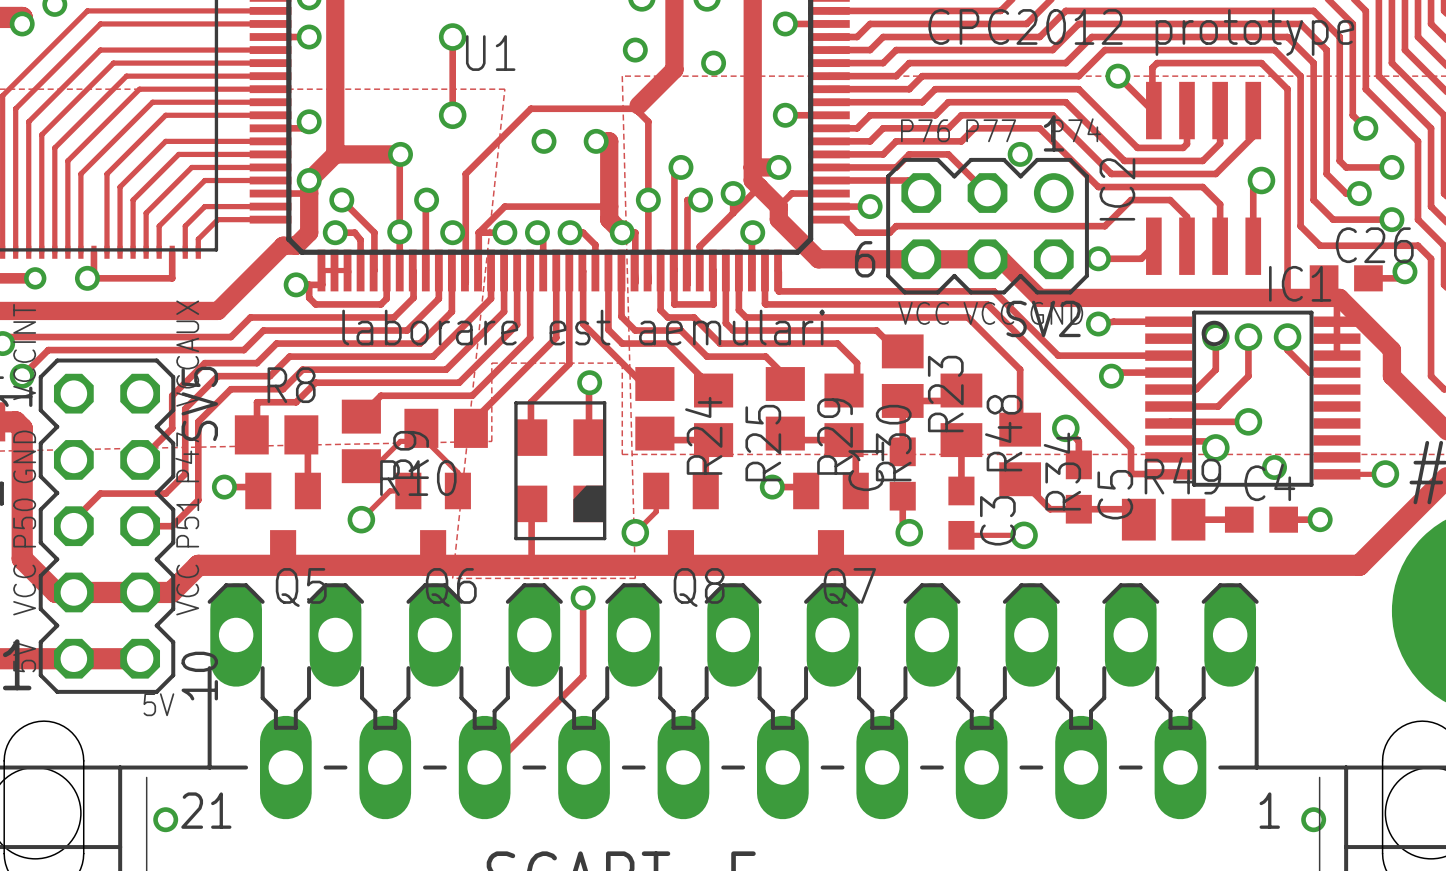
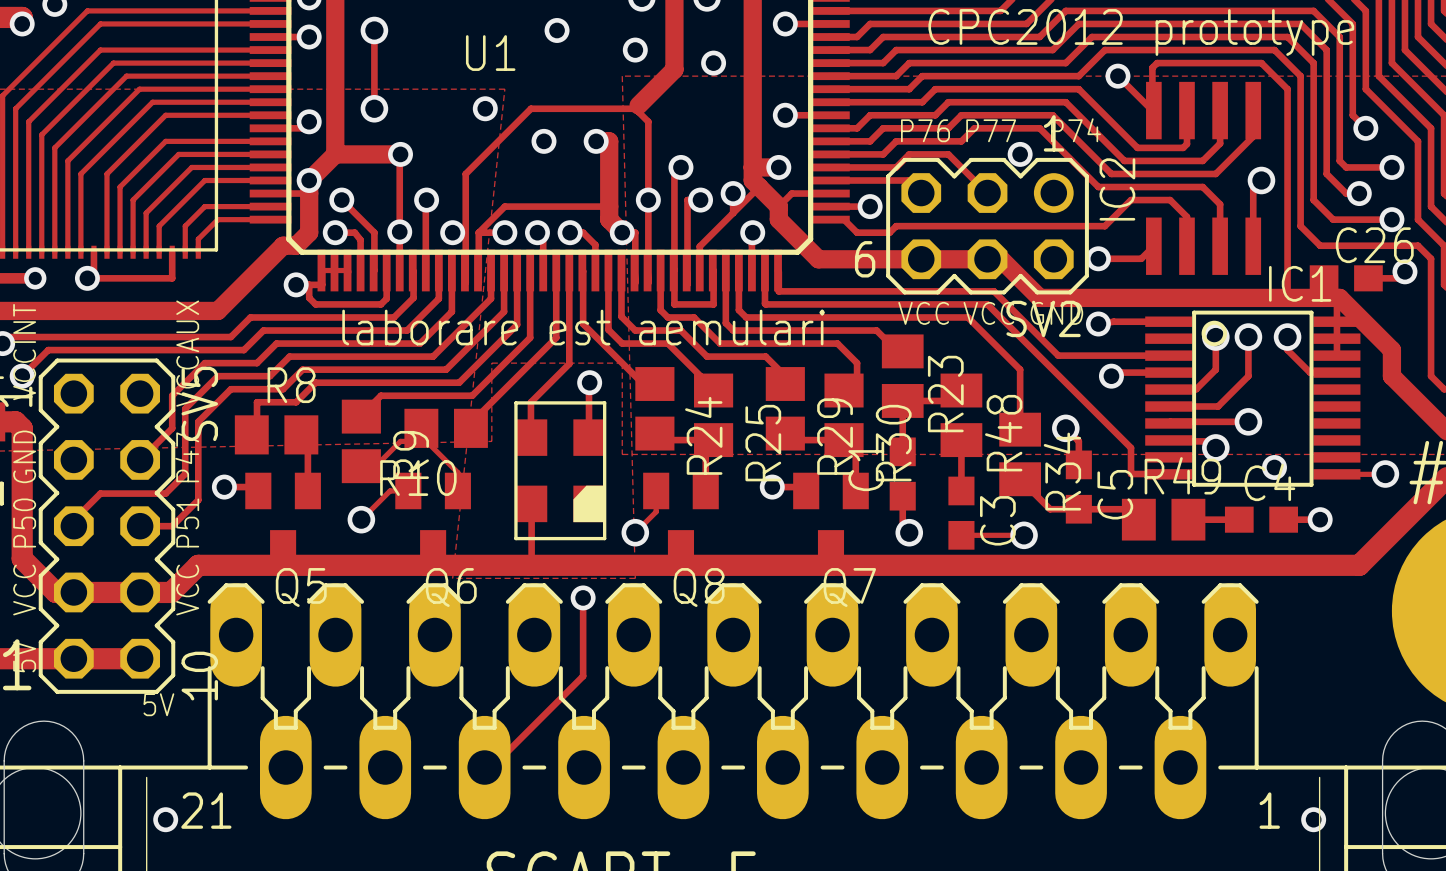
via: none -> (374, 30)
via: none -> (557, 30)
track: (452, 37) (452, 115) -> (374, 30) (374, 108)
via: (452, 37) -> none
via: none -> (374, 108)
via: none -> (485, 108)
via: (452, 115) -> none

